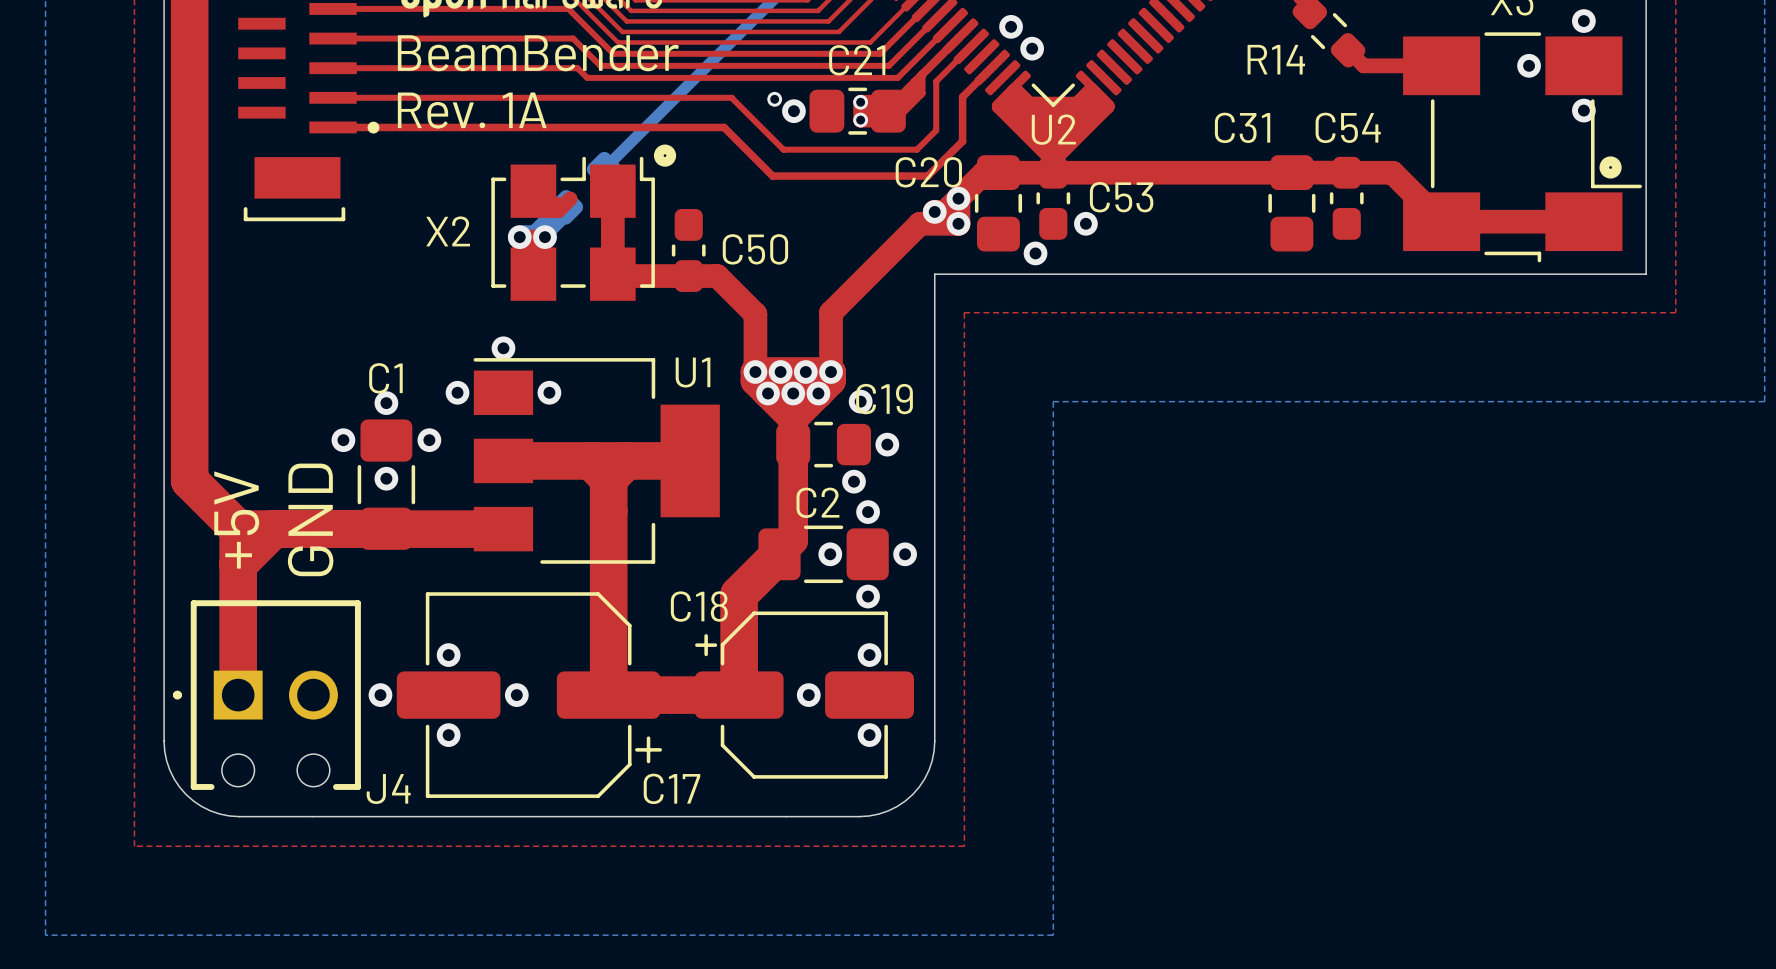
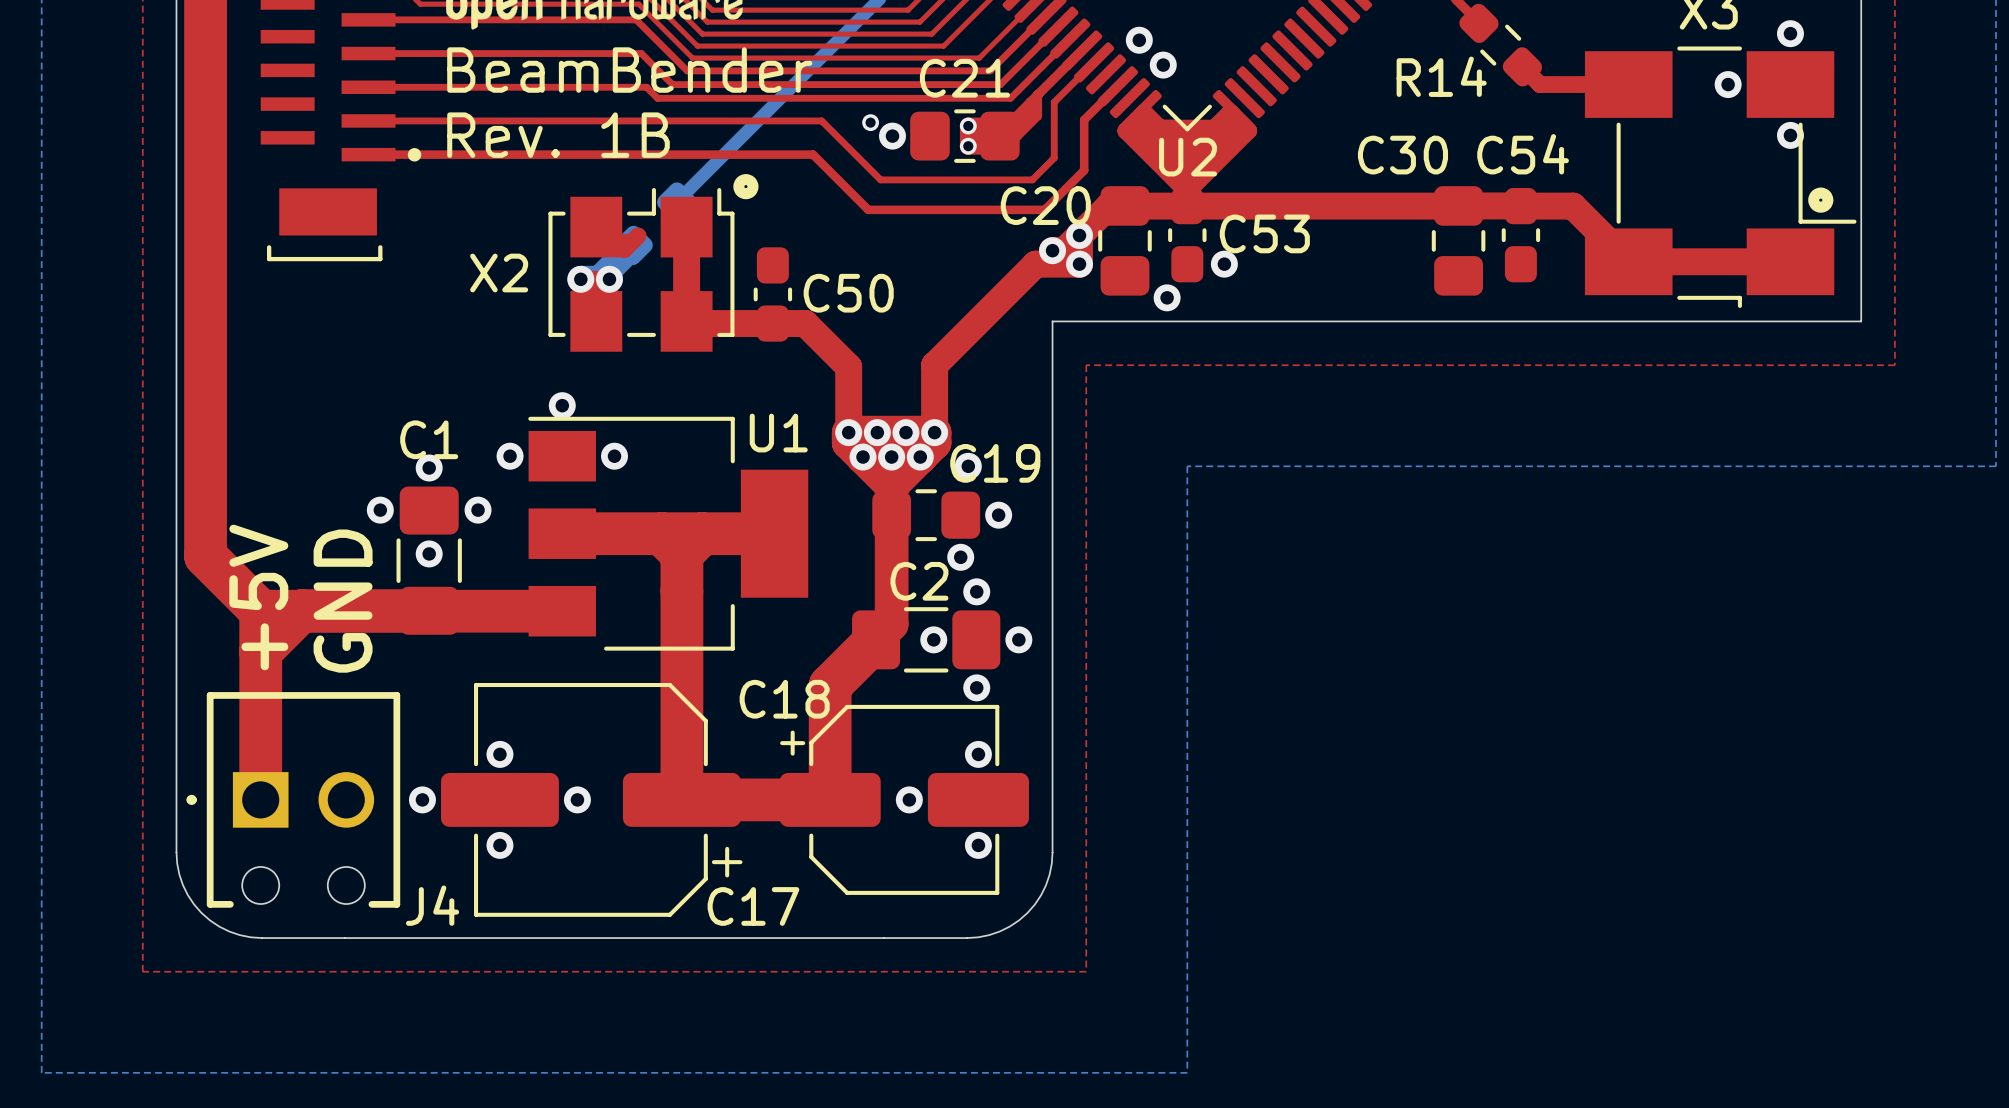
text: Rev. 1A (472, 110) -> Rev. 1B (558, 135)
C31 name: C31 (1242, 127) -> C30 (1402, 155)

